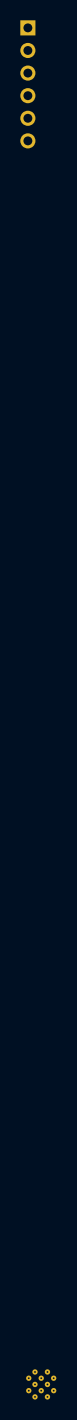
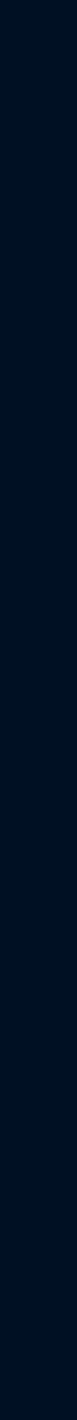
part: (27, 84) -> none
part: (41, 1384) -> none

